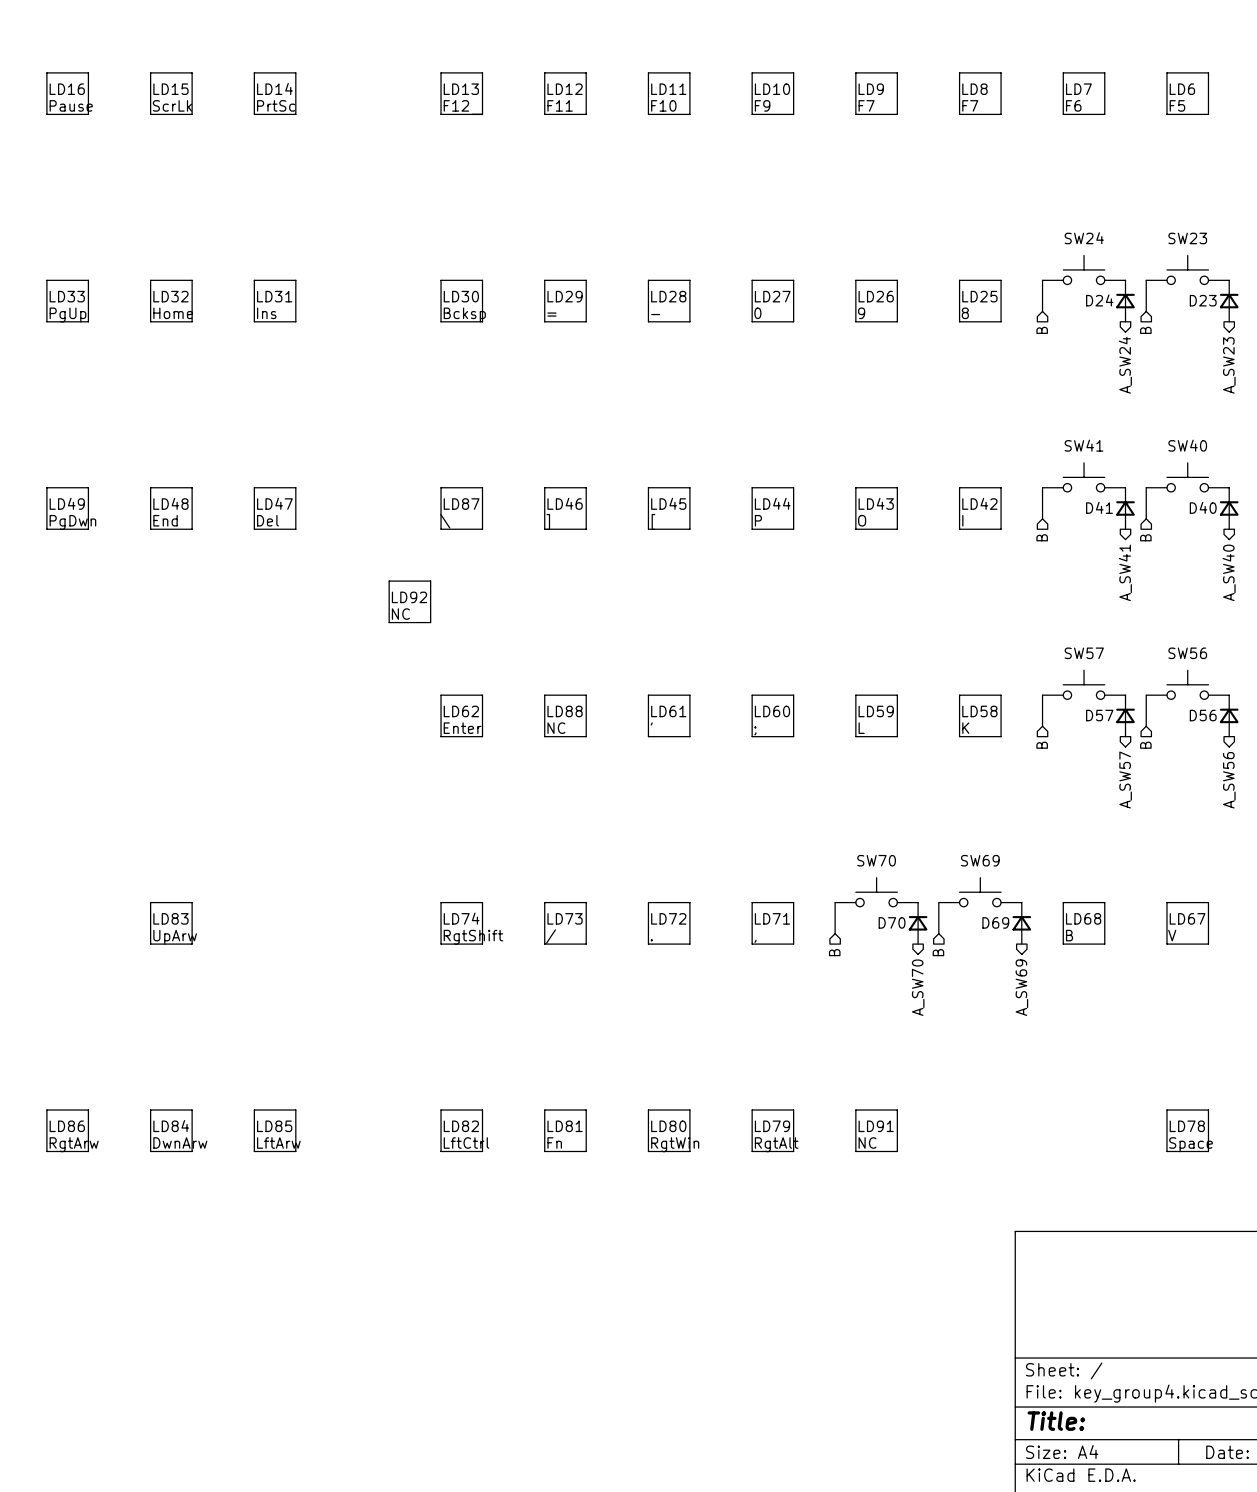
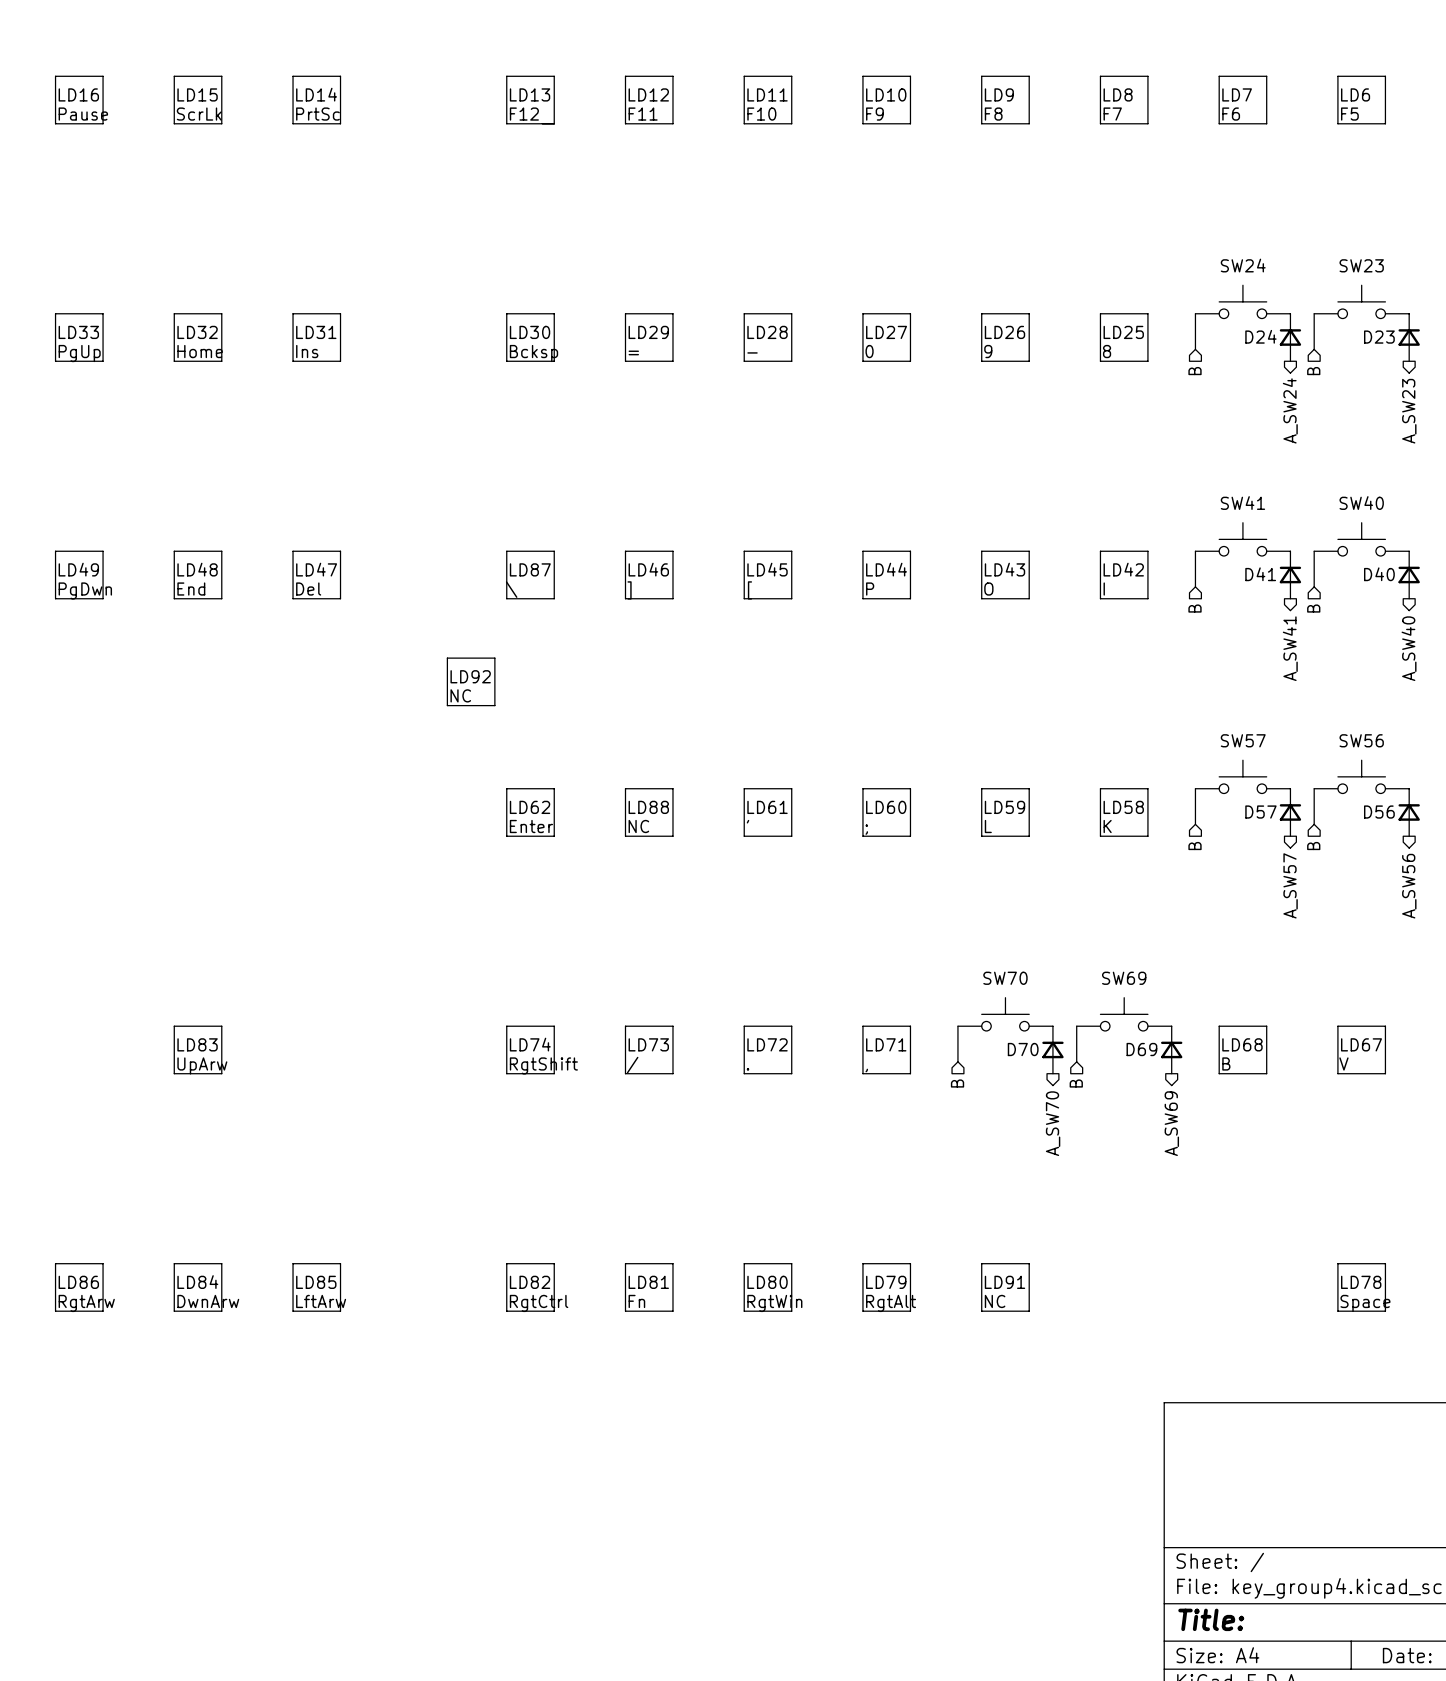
text: F7 (866, 105) -> F8 (993, 114)
text: LftCtrl (466, 1142) -> RgtCtrl (539, 1303)

